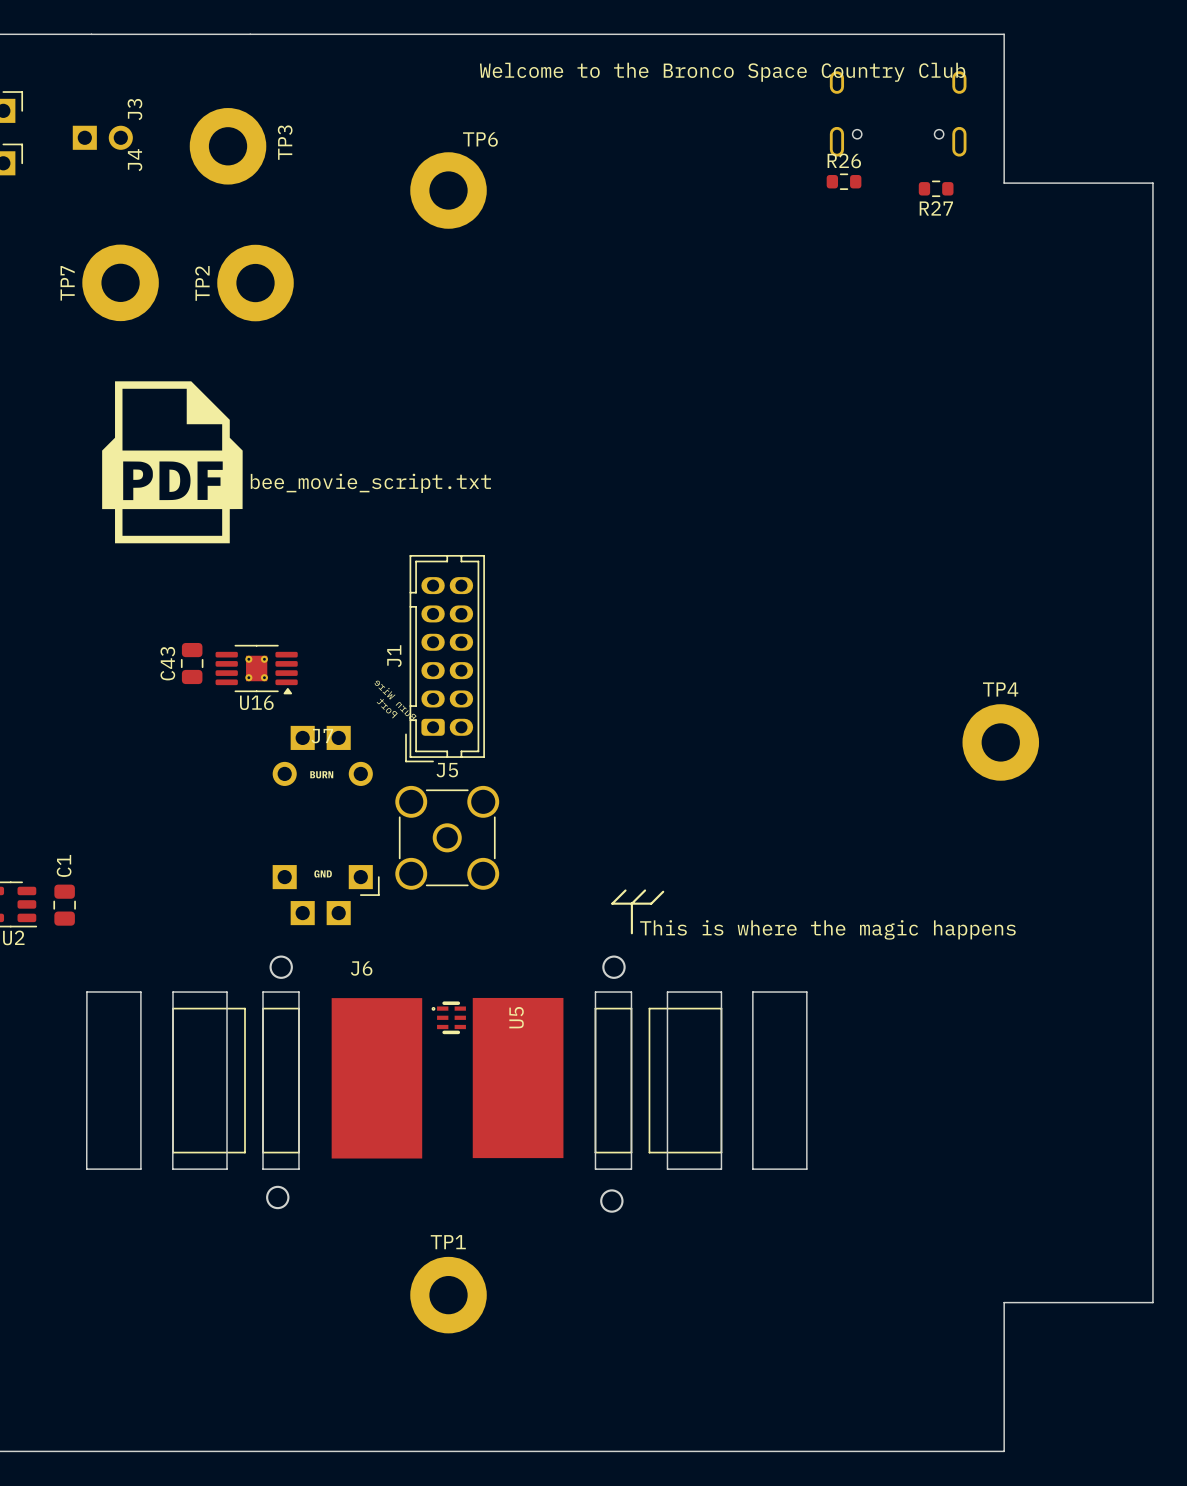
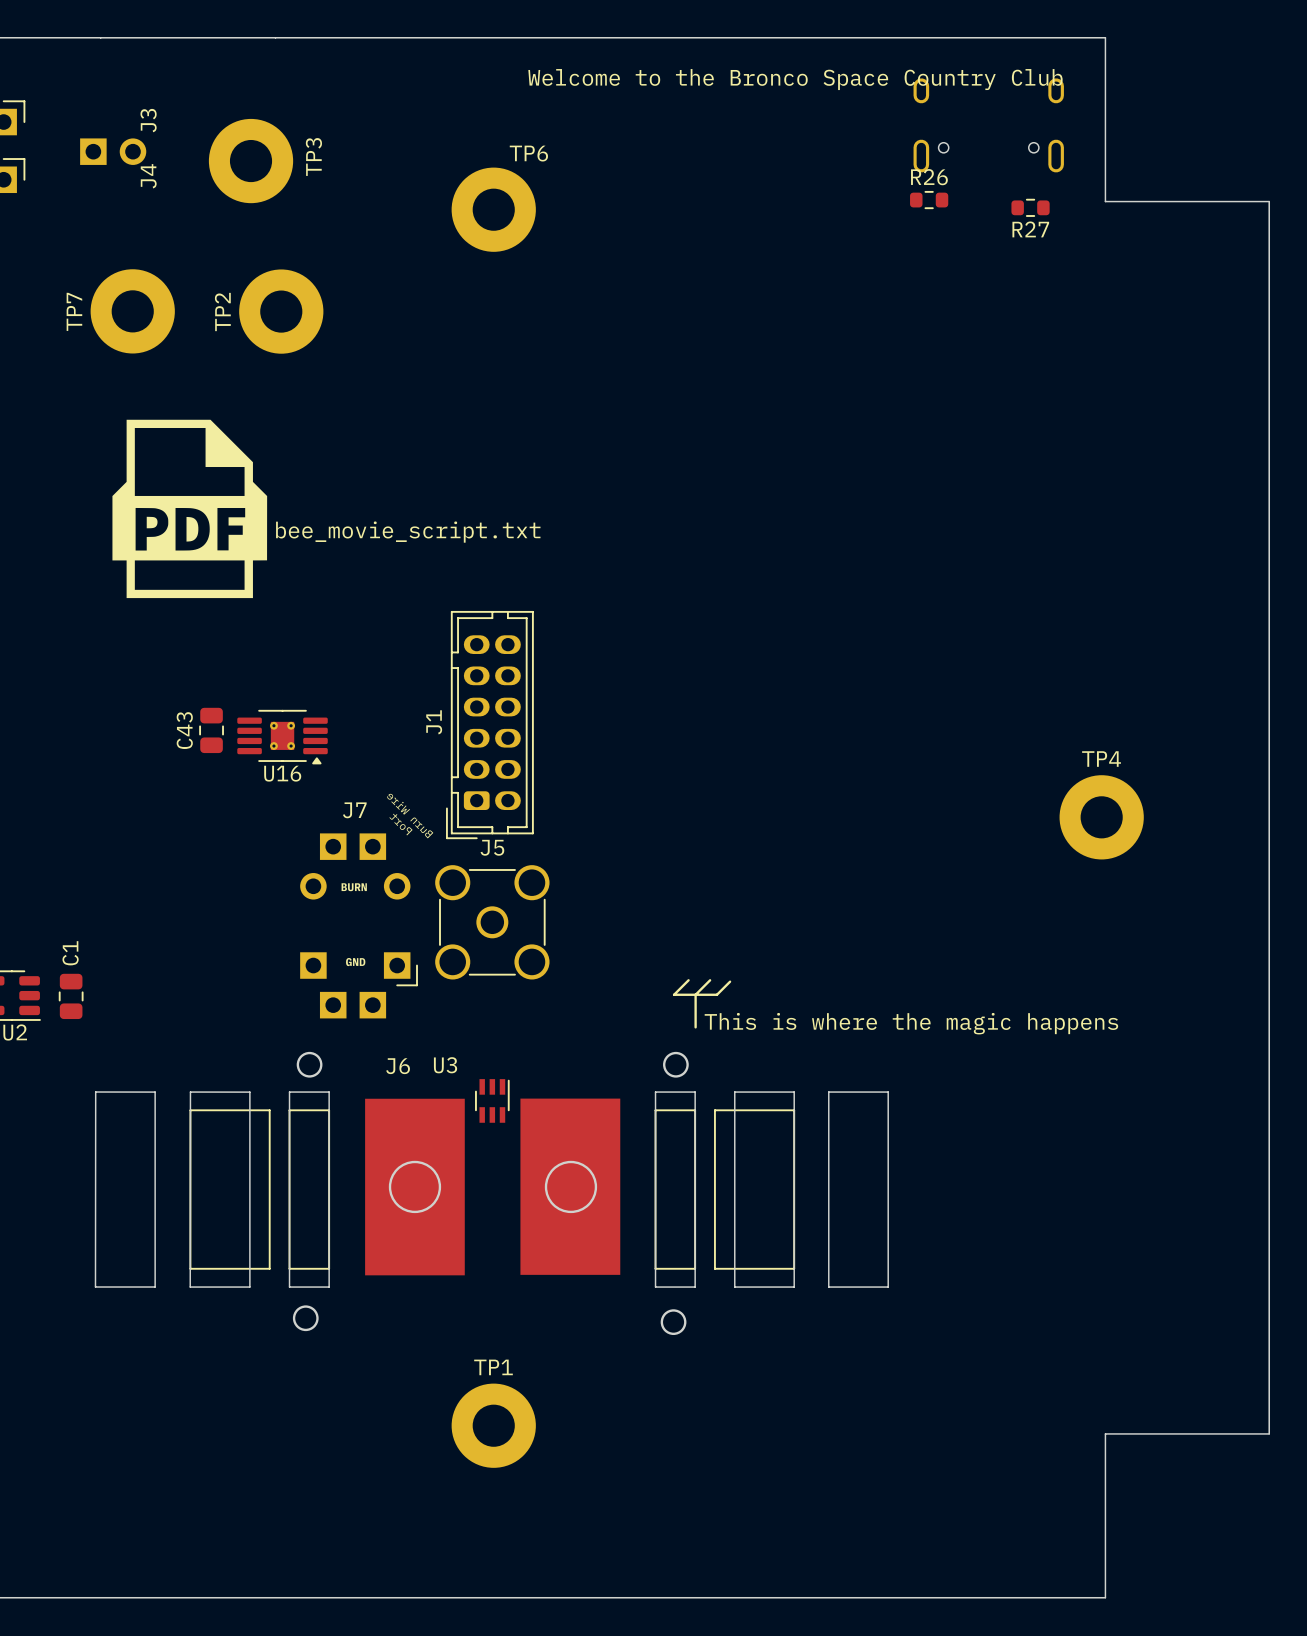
J7 footprint: [272, 725, 380, 926] -> [300, 833, 418, 1019]
J6 footprint: [86, 955, 808, 1213] -> [95, 1051, 889, 1336]
U3: none -> (492, 1100)
U5: (448, 1017) -> none

